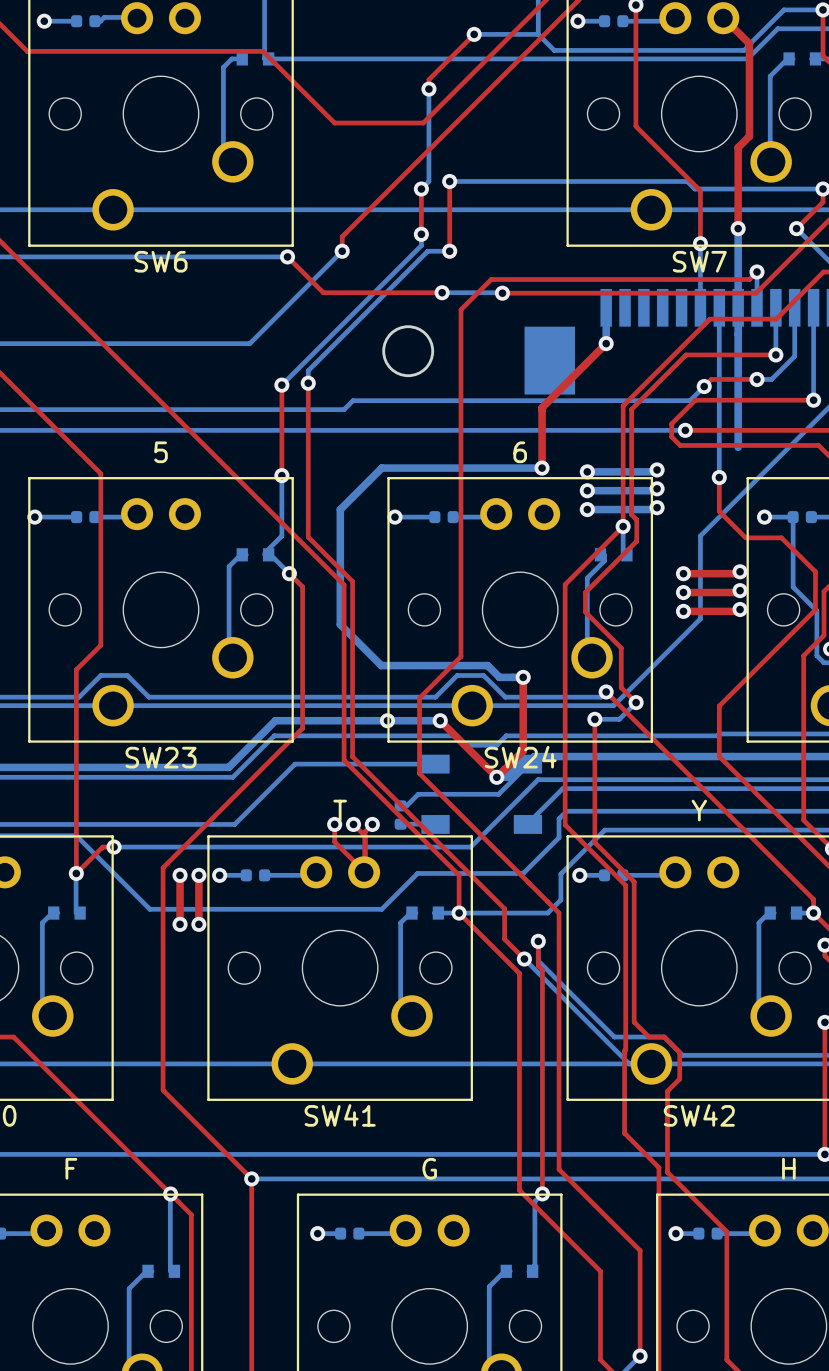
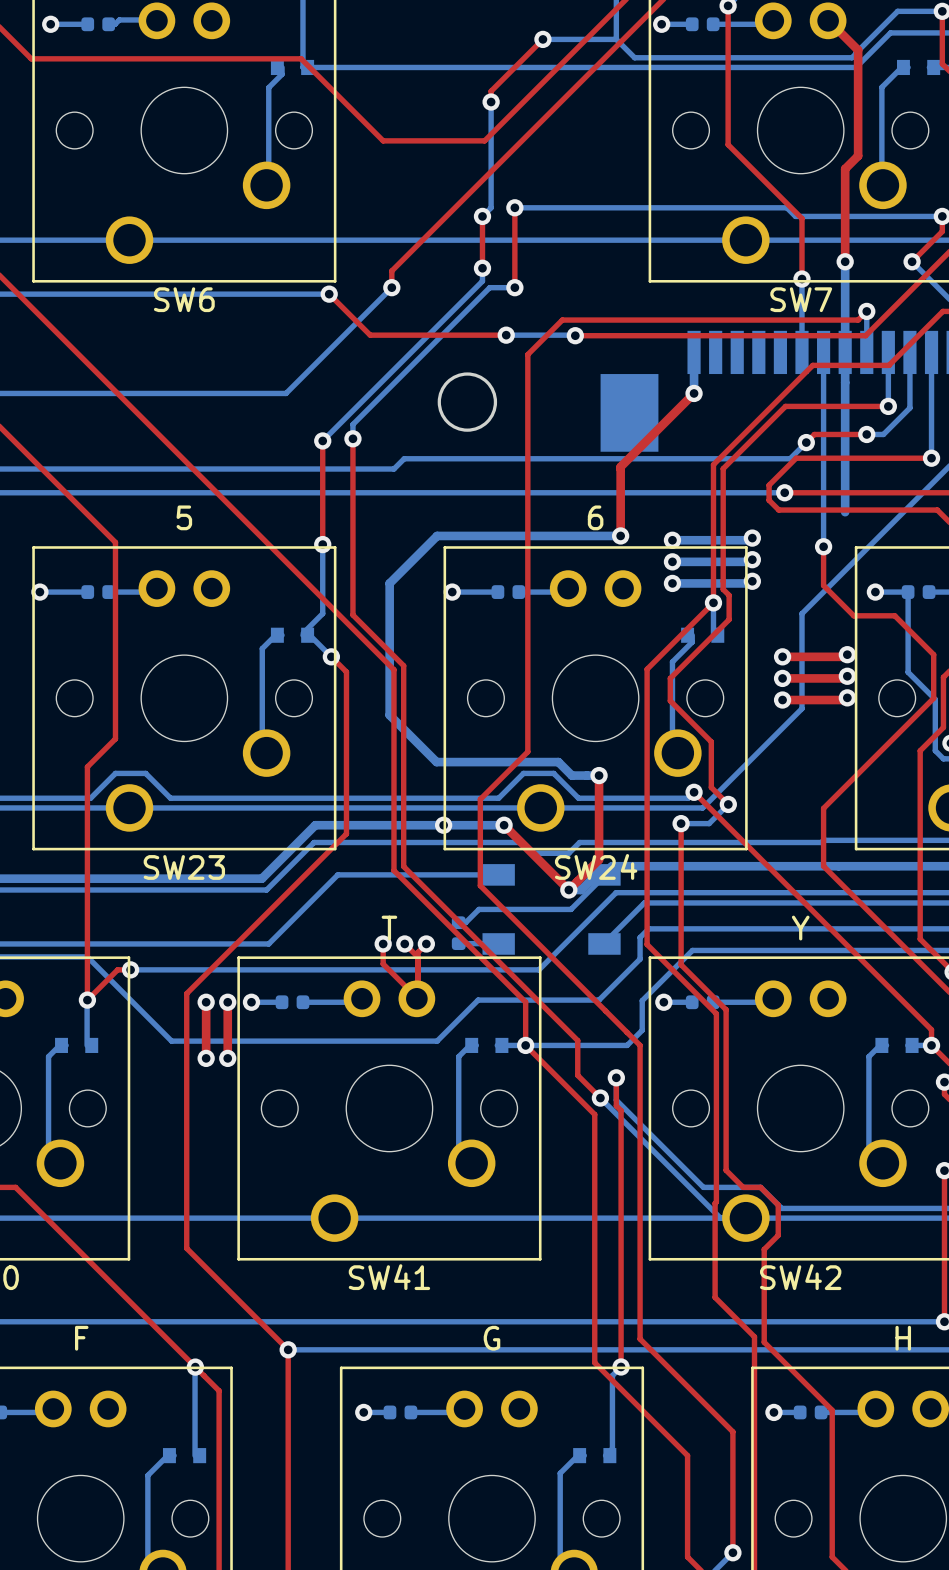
bottom track: (242, 58) (231, 58) (223, 67) (223, 151) (232, 160) -> none
bottom track: none -> (282, 67) (282, 74) (268, 87) (268, 184)

